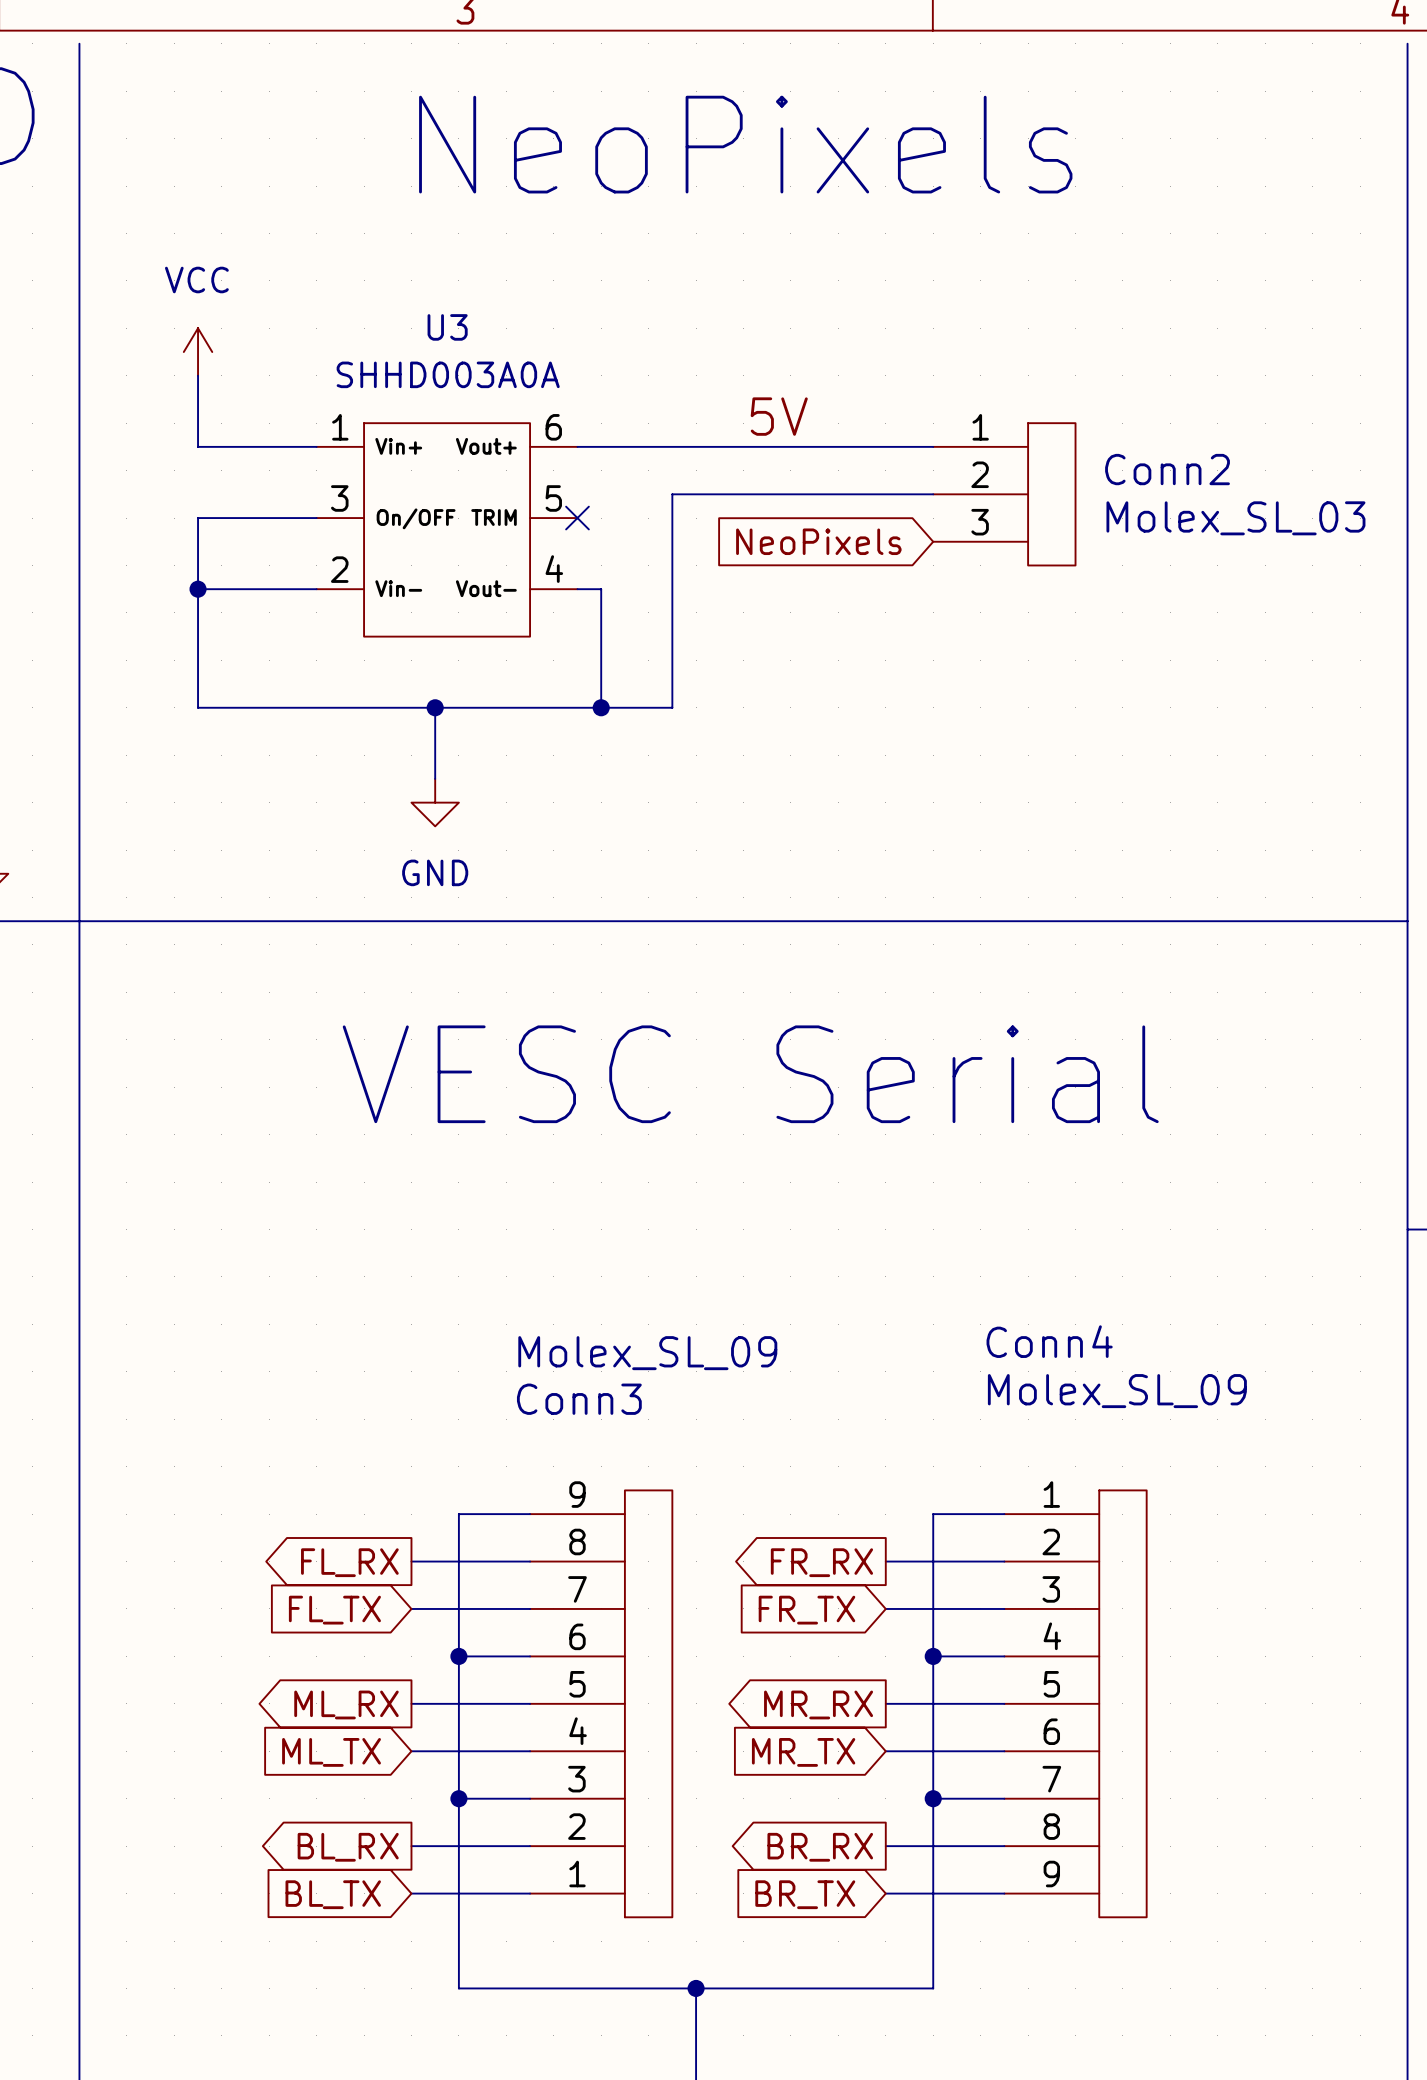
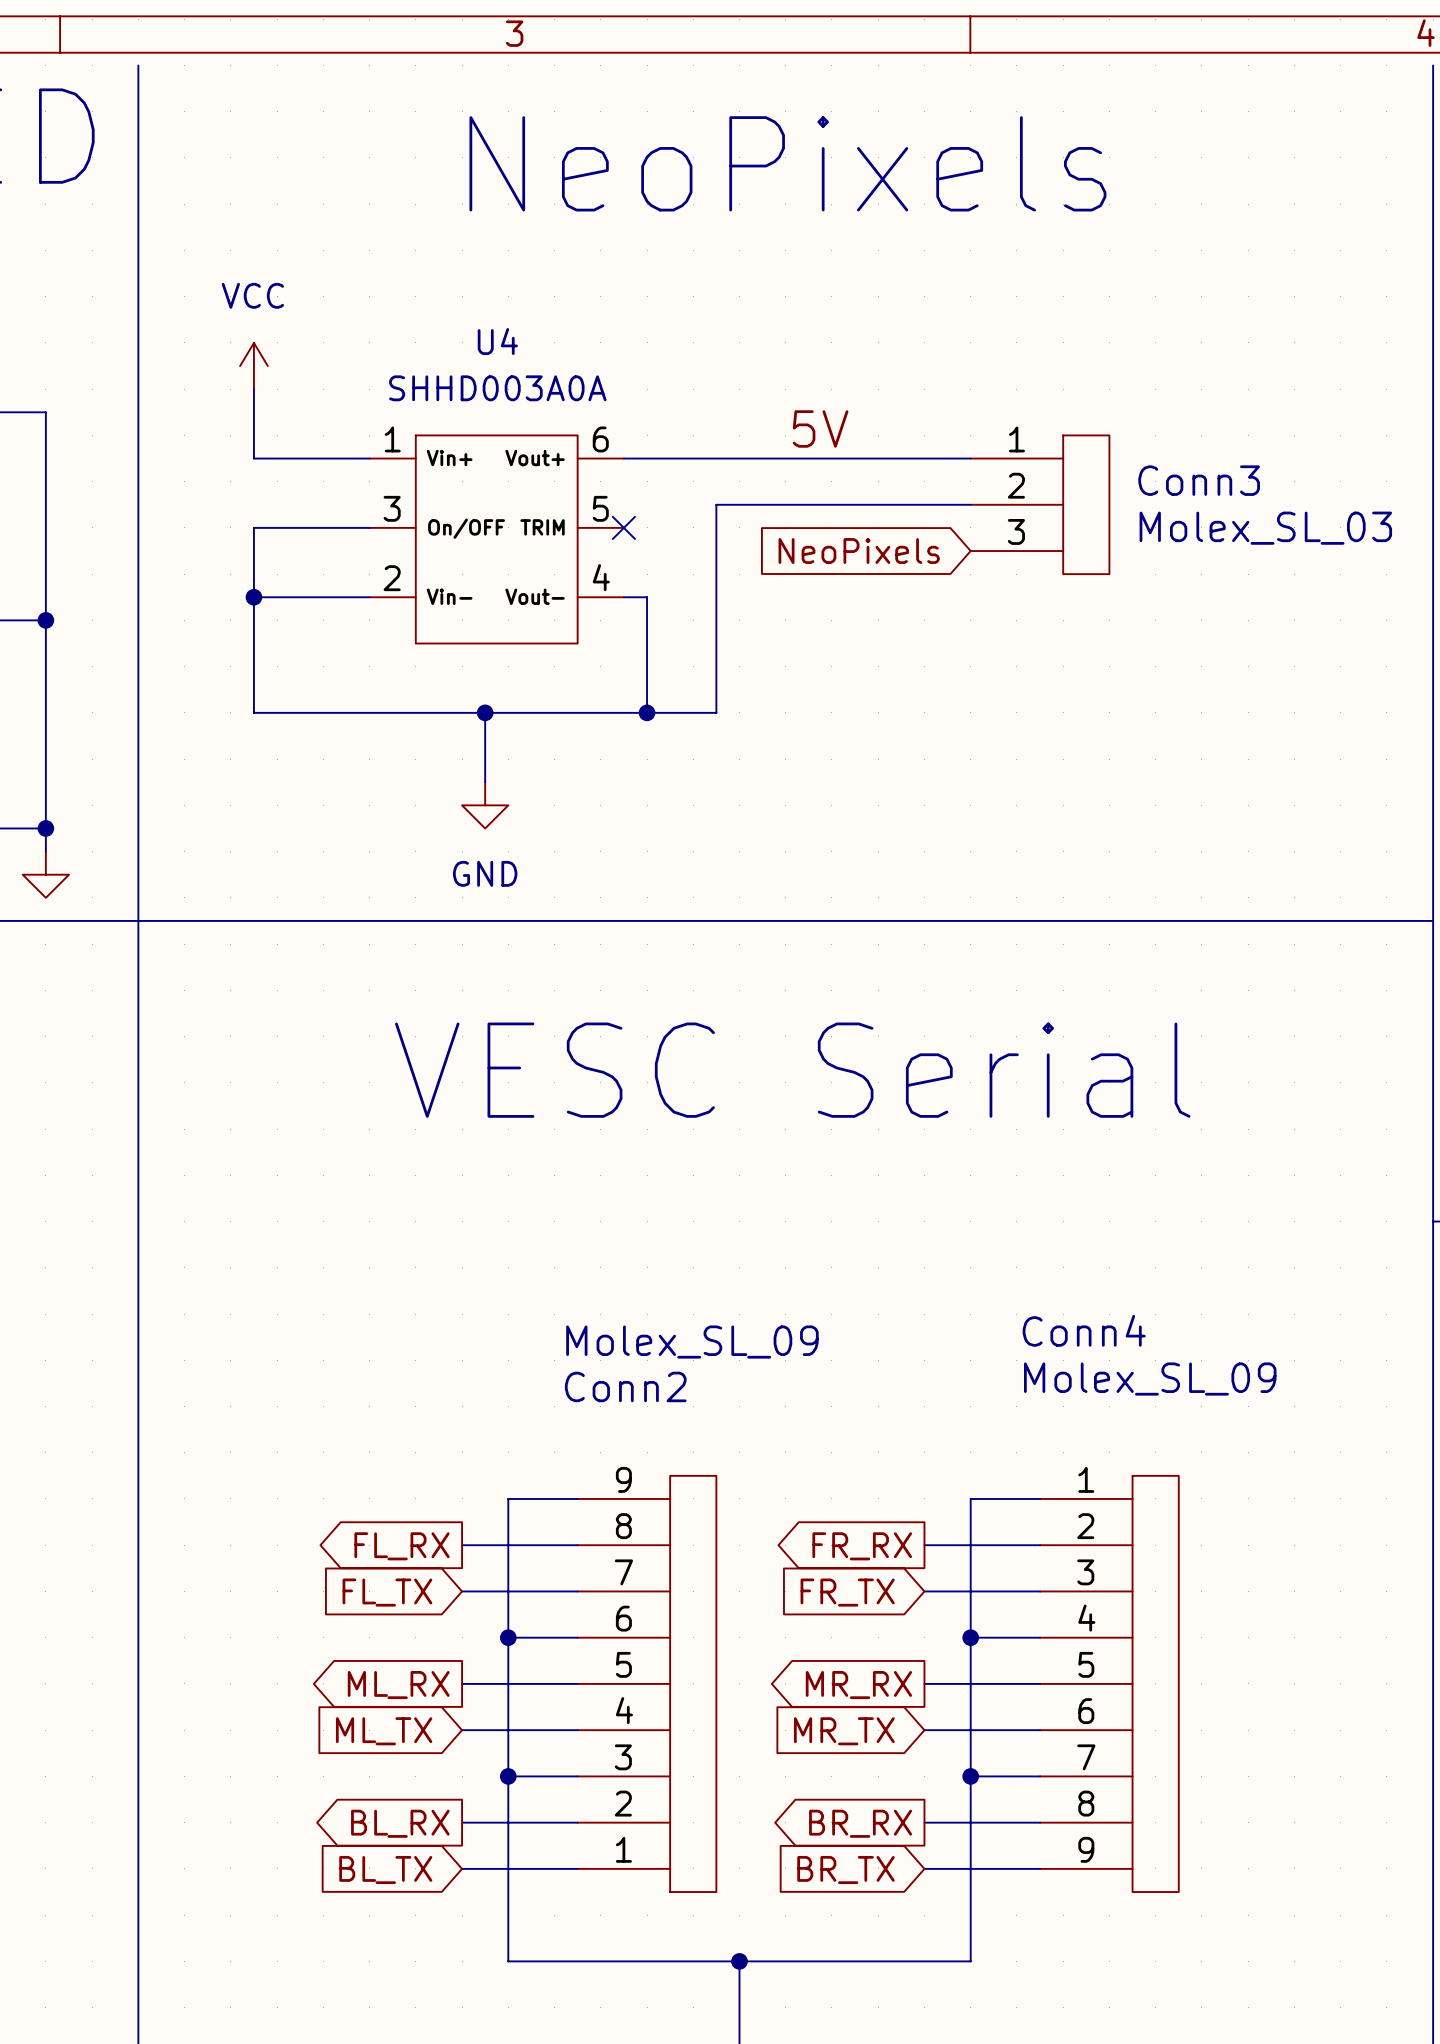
U3 name: U3 (447, 327) -> U4 (497, 341)
Conn2 name: Conn2 (1167, 469) -> Conn3 (1199, 480)
Conn3 name: Conn3 (579, 1399) -> Conn2 (625, 1386)

